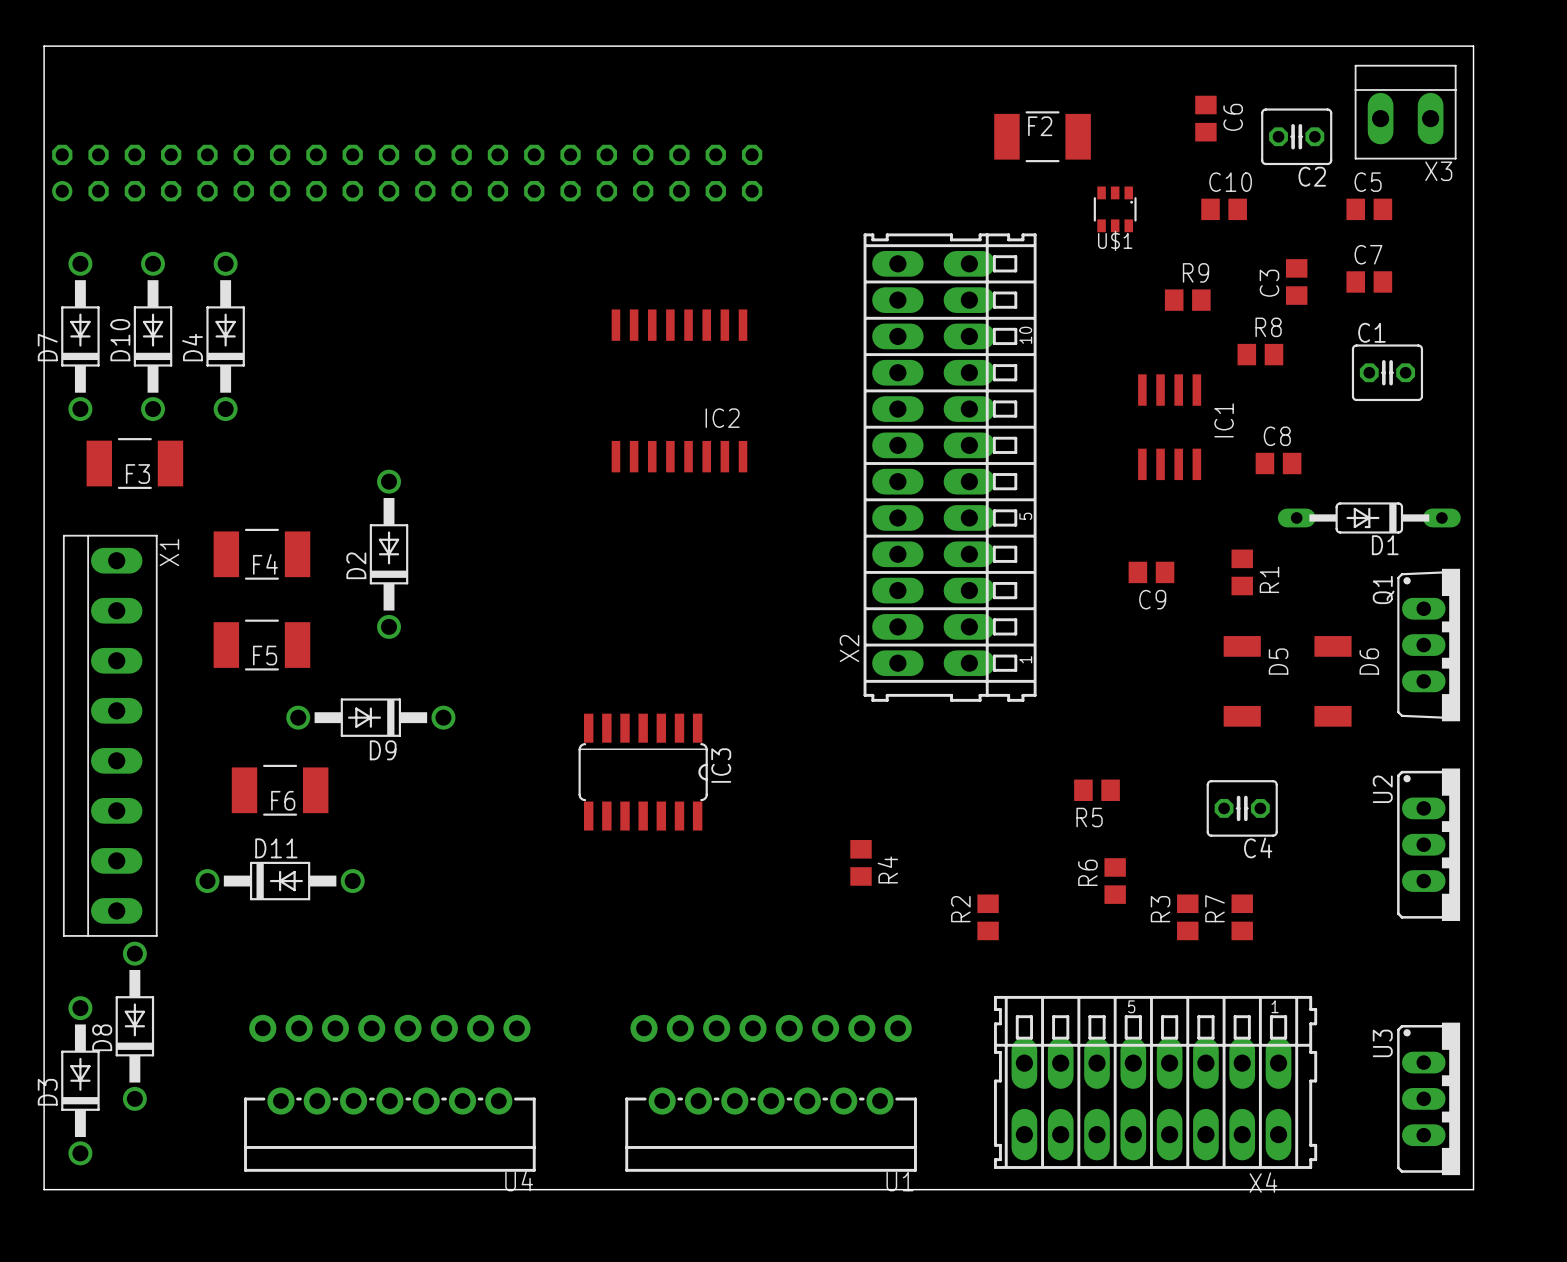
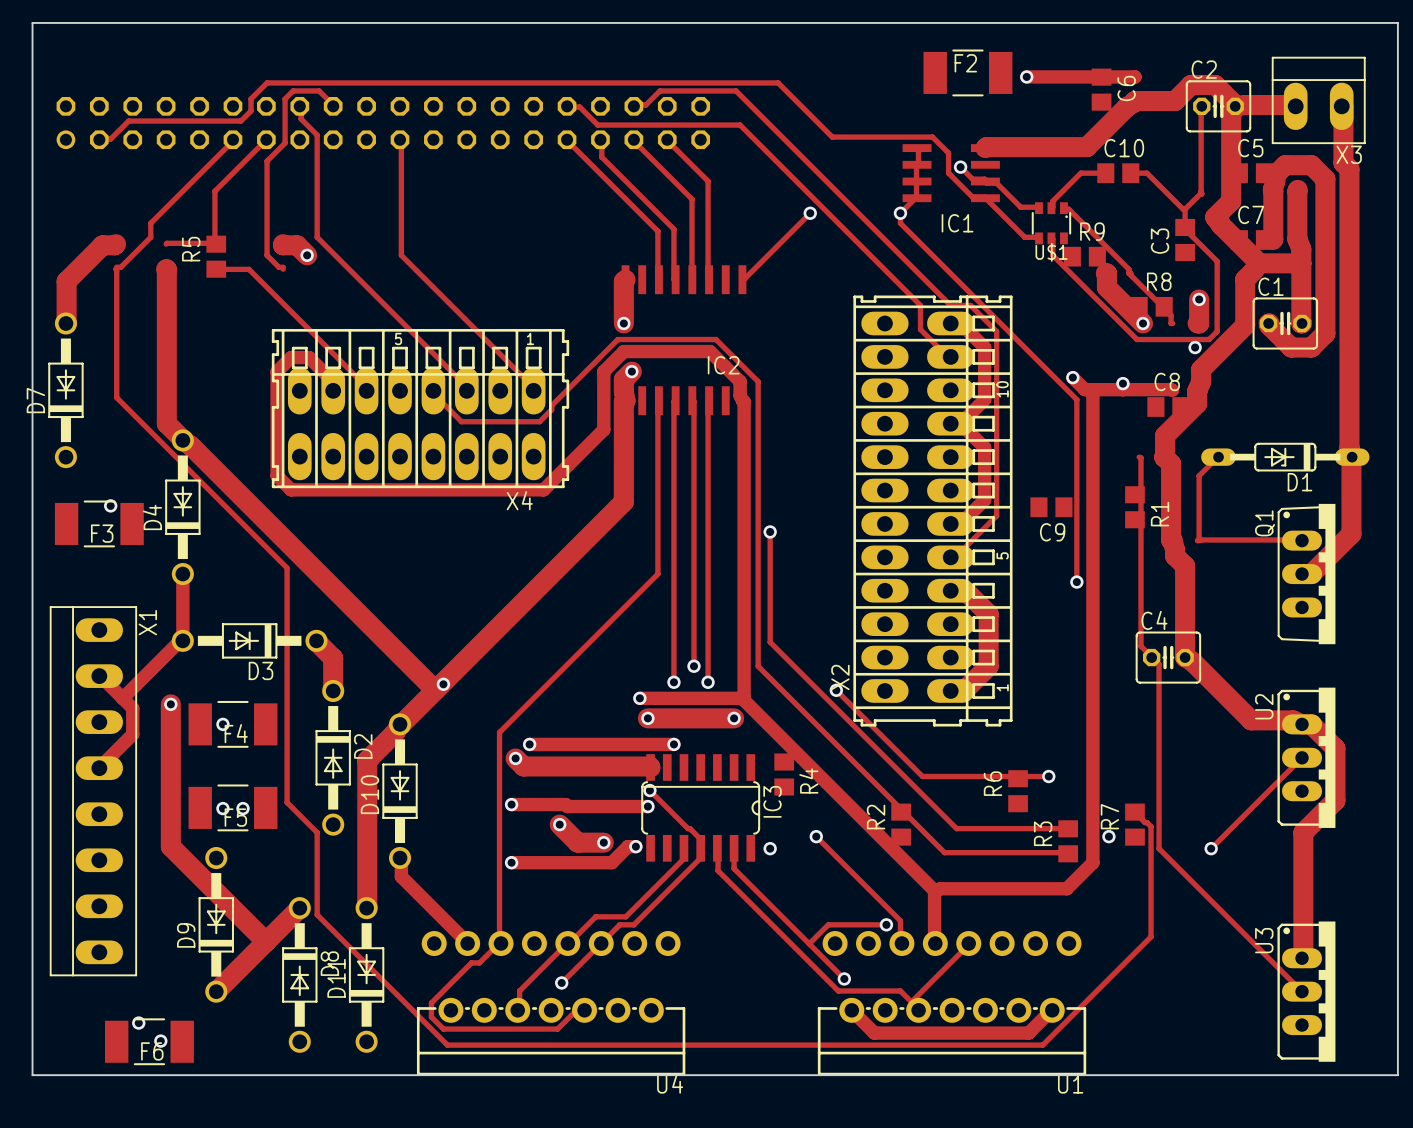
board edge: (1473, 46) (1473, 1189) -> (1347, 22) (1397, 22) (1397, 1075) (1347, 1075)
track: none -> (1026, 76) (1134, 76)
via: none -> (1026, 76)
X3 position: (1405, 112) -> (1318, 100)
track: none -> (299, 106) (301, 119) (317, 135) (317, 237) (465, 385) (466, 390)
track: none -> (333, 106) (319, 90) (293, 90) (285, 98) (285, 143) (267, 161) (267, 255) (283, 269)
track: none -> (567, 106) (579, 107) (597, 125) (740, 125) (920, 305) (920, 329) (946, 355) (950, 356)
track: none -> (633, 106) (645, 105) (659, 90) (736, 90) (950, 305) (970, 305) (996, 331) (996, 515) (956, 556) (950, 557)
F2 position: (1042, 136) -> (967, 72)
C2 position: (1296, 136) -> (1218, 106)
track: none -> (1201, 106) (1201, 194) (1185, 209)
track: none -> (1235, 106) (1215, 84) (1191, 84) (1175, 101) (1134, 101) (1086, 147) (985, 148)
track: none -> (1235, 106) (1231, 115) (1231, 201) (1215, 217) (1259, 263)
track: none -> (1235, 106) (1295, 106)
track: none -> (1341, 106) (1343, 107) (1343, 163) (1349, 169) (1349, 447) (1352, 457) (1351, 533) (1311, 574) (1302, 574)
track: none -> (99, 139) (110, 139) (128, 121) (240, 121) (251, 111) (251, 98) (267, 82) (778, 82) (832, 137) (932, 137) (948, 153) (948, 173) (972, 197) (984, 197) (1024, 237) (1038, 238)
track: none -> (232, 139) (150, 223) (150, 237) (120, 267) (116, 267) (116, 397) (287, 568) (287, 802) (317, 832) (317, 914) (447, 1045) (1042, 1045) (1151, 936) (1151, 826) (1134, 812)
track: none -> (266, 139) (214, 191) (216, 244) (166, 244)
part position: (407, 173) -> (383, 123)
track: none -> (400, 139) (401, 255) (533, 387) (533, 390)
track: none -> (567, 139) (657, 231) (658, 279)
track: none -> (600, 139) (601, 157) (673, 229) (673, 279) (675, 279)
track: none -> (633, 139) (691, 199) (692, 279)
track: none -> (667, 139) (708, 181) (709, 279)
C2 name position: C2 (1312, 176) -> C2 (1204, 69)
track: none -> (917, 148) (917, 198) (900, 213) (900, 223) (1076, 399) (1076, 582)
track: none -> (960, 167) (972, 179) (984, 179) (986, 183) (996, 183) (1020, 207) (1038, 208)
via: none -> (960, 167)
U$1 position: (1115, 209) -> (1051, 223)
track: none -> (1105, 173) (1080, 173) (1052, 201) (1051, 208)
track: none -> (1130, 173) (1147, 173) (1185, 209)
track: none -> (1297, 189) (1297, 239) (1301, 249) (1302, 323)
track: none -> (1063, 208) (1068, 209) (1128, 269) (1128, 273) (1171, 315) (1171, 323) (1172, 323)
track: none -> (1185, 209) (1185, 229) (1217, 261) (1217, 331) (1209, 339) (1136, 339) (1052, 255) (1051, 238)
track: none -> (810, 213) (742, 279)
via: none -> (810, 213)
via: none -> (900, 213)
track: none -> (1272, 239) (1272, 189) (1275, 175) (1285, 165) (1311, 165) (1325, 179) (1325, 333) (1311, 347) (1291, 347) (1268, 323)
track: none -> (116, 244) (102, 245) (66, 281) (65, 323)
track: none -> (283, 244) (297, 245) (307, 255)
via: none -> (307, 255)
track: none -> (1259, 263) (1301, 263)
track: none -> (1259, 263) (1245, 279) (1245, 325) (1201, 369) (1197, 403) (1165, 435) (1164, 457) (1171, 463) (1171, 539) (1175, 556) (1185, 566) (1185, 657)
track: none -> (166, 269) (166, 423) (435, 690)
track: none -> (216, 269) (249, 269) (365, 385) (366, 390)
track: none -> (1105, 273) (1106, 287) (1143, 323)
track: none -> (625, 279) (623, 281) (623, 323)
D7 position: (80, 336) -> (65, 390)
D10 position: (153, 336) -> (400, 791)
D4 position: (225, 336) -> (182, 507)
track: none -> (1199, 299) (1199, 323) (1197, 323)
via: none -> (1199, 299)
via: none -> (623, 323)
track: none -> (950, 323) (960, 323) (984, 347) (984, 399) (964, 419) (950, 423) (960, 423) (984, 447) (984, 499) (960, 523) (950, 523)
via: none -> (1143, 323)
C1 position: (1387, 372) -> (1285, 323)
IC2 position: (679, 390) -> (683, 340)
via: none -> (1195, 347)
track: none -> (631, 371) (623, 379) (625, 400) (623, 401) (623, 501) (400, 724) (395, 732) (367, 760) (366, 908)
via: none -> (631, 371)
IC1 rotation: 0° (1169, 427) -> 90° clockwise (951, 173)
IC1 position: (1169, 427) -> (951, 173)
track: none -> (1072, 377) (1084, 389) (1172, 390)
via: none -> (1072, 377)
via: none -> (1122, 383)
track: none -> (1092, 389) (1092, 862) (1066, 888) (940, 888) (934, 890)
track: none -> (333, 390) (333, 381) (309, 357) (291, 357) (277, 371) (277, 475) (291, 489) (543, 489) (603, 429) (603, 371) (623, 351) (710, 351) (740, 381) (740, 395) (744, 401) (744, 700) (934, 890)
track: none -> (433, 390) (433, 393) (461, 421) (539, 421) (551, 409) (551, 405) (617, 339) (716, 339) (758, 381) (758, 666) (944, 852) (1068, 853)
track: none -> (658, 400) (657, 574) (499, 732) (501, 943) (479, 962) (471, 962) (431, 1003) (431, 1017) (443, 1029) (557, 1029) (575, 1011) (584, 1010)
track: none -> (675, 400) (673, 401) (673, 682)
track: none -> (692, 400) (694, 401) (694, 666)
track: none -> (709, 400) (708, 682)
F3 position: (134, 463) -> (99, 523)
X2 position: (950, 467) -> (932, 511)
track: none -> (1139, 457) (1140, 457) (1140, 646) (1159, 664) (1159, 848) (1302, 991)
track: none -> (1218, 457) (1199, 475) (1199, 539) (1197, 540) (1302, 540)
D1 position: (1369, 517) -> (1285, 457)
F4 position: (261, 554) -> (232, 724)
D2 rotation: 0° (389, 554) -> 180° (333, 757)
D2 position: (389, 554) -> (333, 757)
via: none -> (110, 505)
track: none -> (770, 531) (770, 642) (956, 828) (1068, 828)
via: none -> (770, 531)
track: none -> (182, 574) (182, 640) (176, 644) (122, 698)
F5 position: (261, 645) -> (232, 807)
via: none -> (1076, 582)
track: none -> (950, 590) (966, 592) (988, 614) (988, 666) (964, 690) (950, 690)
D5: (1242, 681) -> none
D6: (1333, 681) -> none
track: none -> (316, 640) (333, 658) (333, 690)
D9 rotation: 0° (370, 717) -> 90° clockwise (216, 924)
D9 position: (370, 717) -> (216, 924)
track: none -> (1185, 656) (1251, 720) (1293, 720) (1302, 724) (1311, 724) (1335, 748) (1335, 800) (1303, 832) (1302, 958)
X1 position: (110, 735) -> (93, 791)
via: none -> (694, 666)
track: none -> (99, 676) (132, 708) (132, 734) (99, 768)
via: none -> (673, 682)
via: none -> (708, 682)
via: none -> (443, 684)
track: none -> (836, 690) (922, 776) (1048, 776)
via: none -> (836, 690)
IC3 position: (643, 772) -> (700, 807)
track: none -> (639, 698) (744, 698)
via: none -> (639, 698)
track: none -> (170, 704) (170, 846) (266, 941)
via: none -> (170, 704)
F6 position: (280, 790) -> (149, 1041)
R5 rotation: 0° (1097, 790) -> 90° clockwise (216, 256)
R5 position: (1097, 790) -> (216, 256)
track: none -> (647, 718) (734, 718)
via: none -> (647, 718)
via: none -> (734, 718)
via: none -> (222, 724)
C4 position: (1242, 808) -> (1168, 657)
track: none -> (529, 744) (673, 744)
via: none -> (529, 744)
via: none -> (673, 744)
track: none -> (1302, 757) (1211, 848)
track: none -> (515, 758) (523, 766) (650, 767)
via: none -> (515, 758)
C4 name position: C4 (1258, 847) -> C4 (1154, 620)
via: none -> (1048, 776)
track: none -> (649, 790) (700, 838) (700, 858) (633, 924) (619, 924) (561, 982)
via: none -> (649, 790)
D11 rotation: 0° (280, 881) -> 90° counterclockwise (366, 974)
D11 position: (280, 881) -> (366, 974)
track: none -> (511, 804) (647, 806)
via: none -> (511, 804)
via: none -> (647, 806)
via: none -> (222, 808)
via: none -> (242, 808)
track: none -> (559, 824) (577, 842) (603, 842)
via: none -> (559, 824)
R3 position: (1187, 917) -> (1068, 841)
track: none -> (816, 836) (900, 920) (901, 943)
via: none -> (816, 836)
via: none -> (1108, 836)
via: none -> (603, 842)
track: none -> (635, 846) (627, 846) (611, 862) (511, 862)
via: none -> (635, 846)
track: none -> (683, 848) (683, 858) (625, 916) (595, 916) (565, 944) (519, 990) (519, 1009) (517, 1010)
track: none -> (717, 848) (718, 870) (838, 990) (900, 990) (918, 1010) (912, 1001) (968, 943)
track: none -> (734, 848) (734, 868) (844, 978)
via: none -> (770, 848)
via: none -> (1211, 848)
track: none -> (400, 858) (401, 876) (467, 943)
via: none -> (511, 862)
track: none -> (934, 890) (935, 943)
track: none -> (299, 908) (216, 991)
D8 rotation: 0° (134, 1026) -> 180° (299, 974)
D8 position: (134, 1026) -> (299, 974)
track: none -> (886, 924) (828, 924) (809, 943)
via: none -> (886, 924)
D3 rotation: 0° (80, 1080) -> 90° counterclockwise (249, 640)
D3 position: (80, 1080) -> (249, 640)
X4 position: (1155, 1082) -> (420, 408)
via: none -> (844, 978)
via: none -> (561, 982)
U4 position: (389, 1093) -> (551, 1003)
U1 position: (771, 1093) -> (951, 1003)
track: none -> (851, 1010) (874, 1033) (1028, 1033) (1052, 1010)
via: none -> (138, 1023)
via: none -> (160, 1041)

